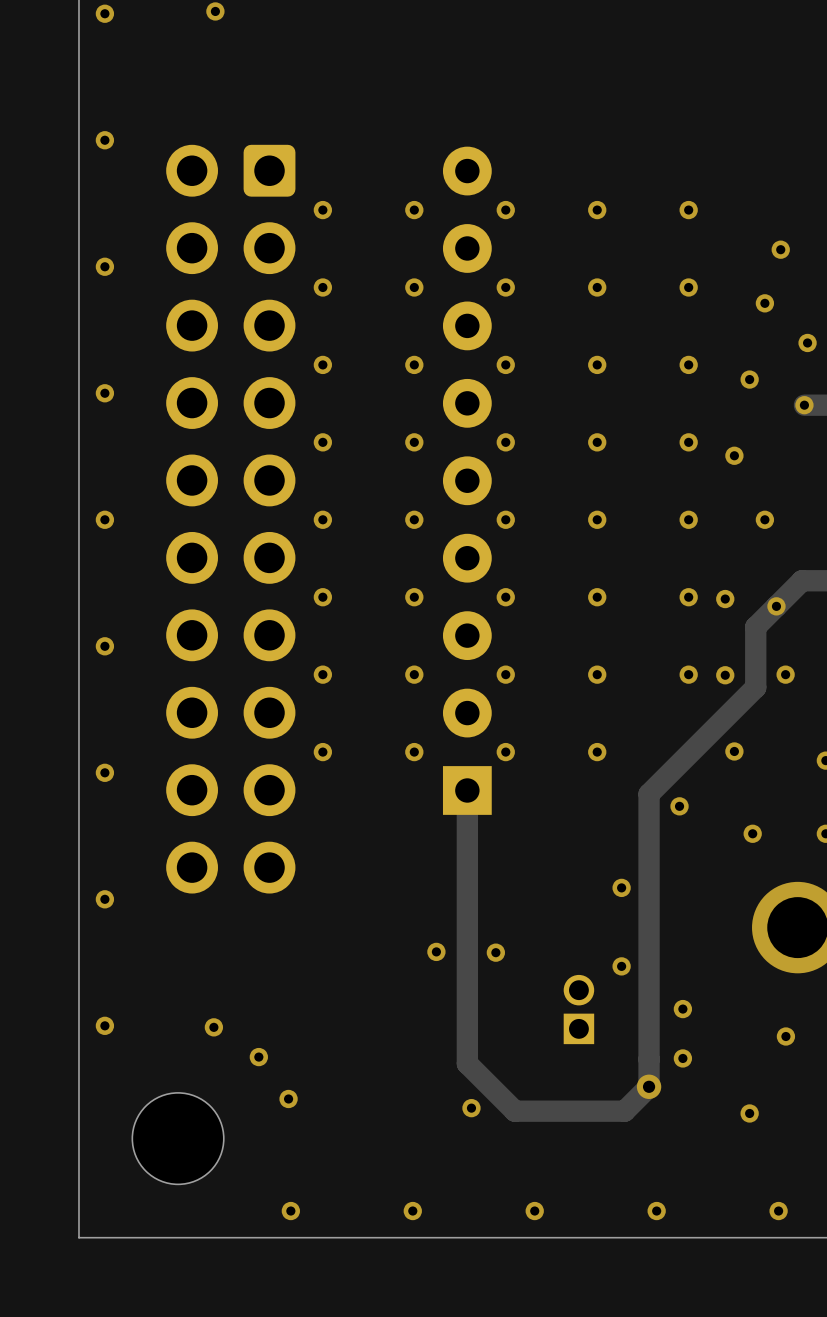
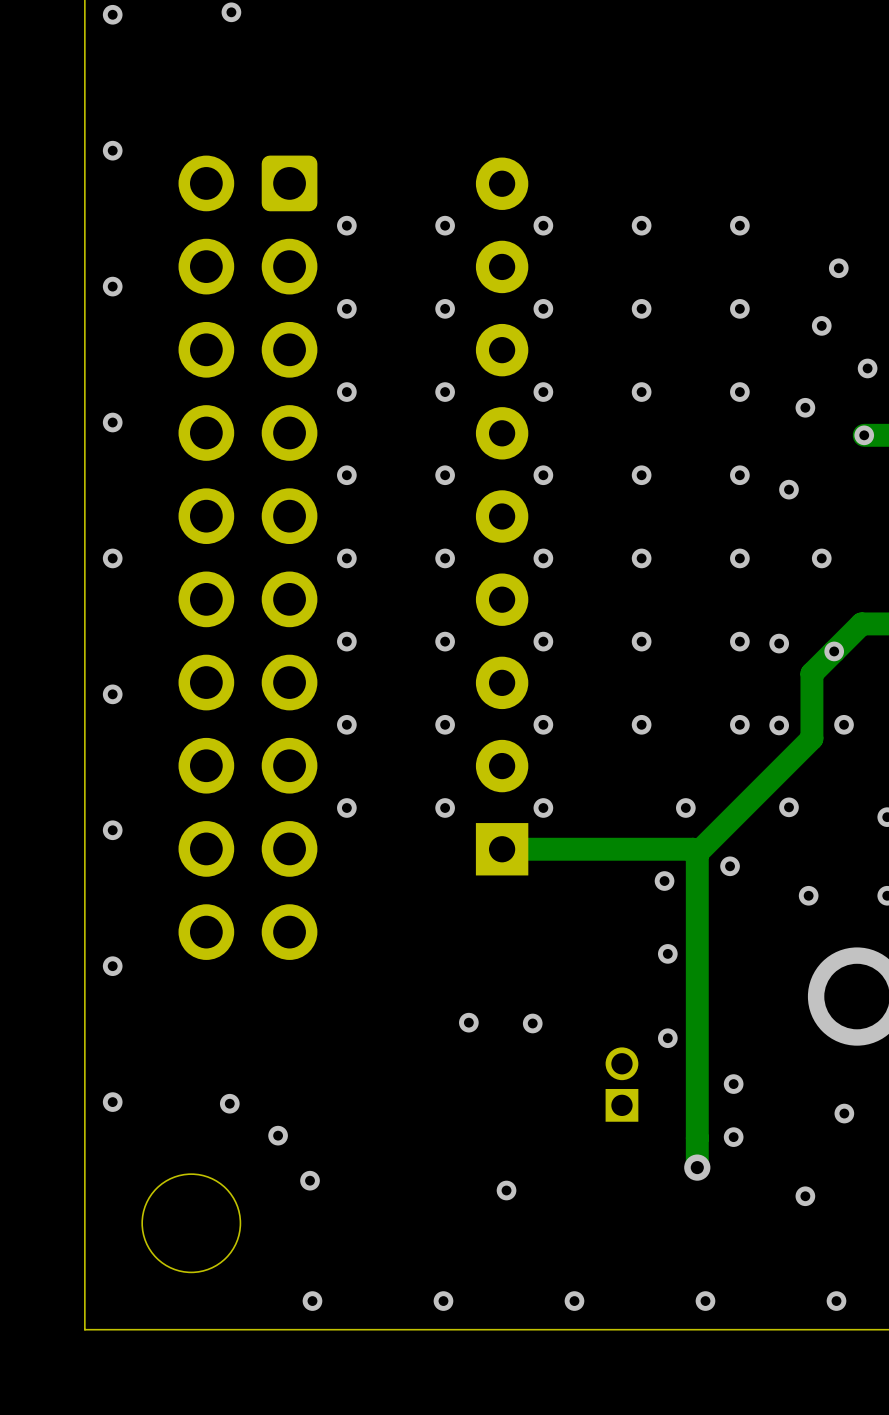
via: (597, 752) -> none
via: none -> (685, 807)
track: (467, 790) (467, 1063) (514, 1111) (624, 1111) (649, 1086) -> (502, 849) (693, 849) (697, 853)
via: none -> (664, 881)

